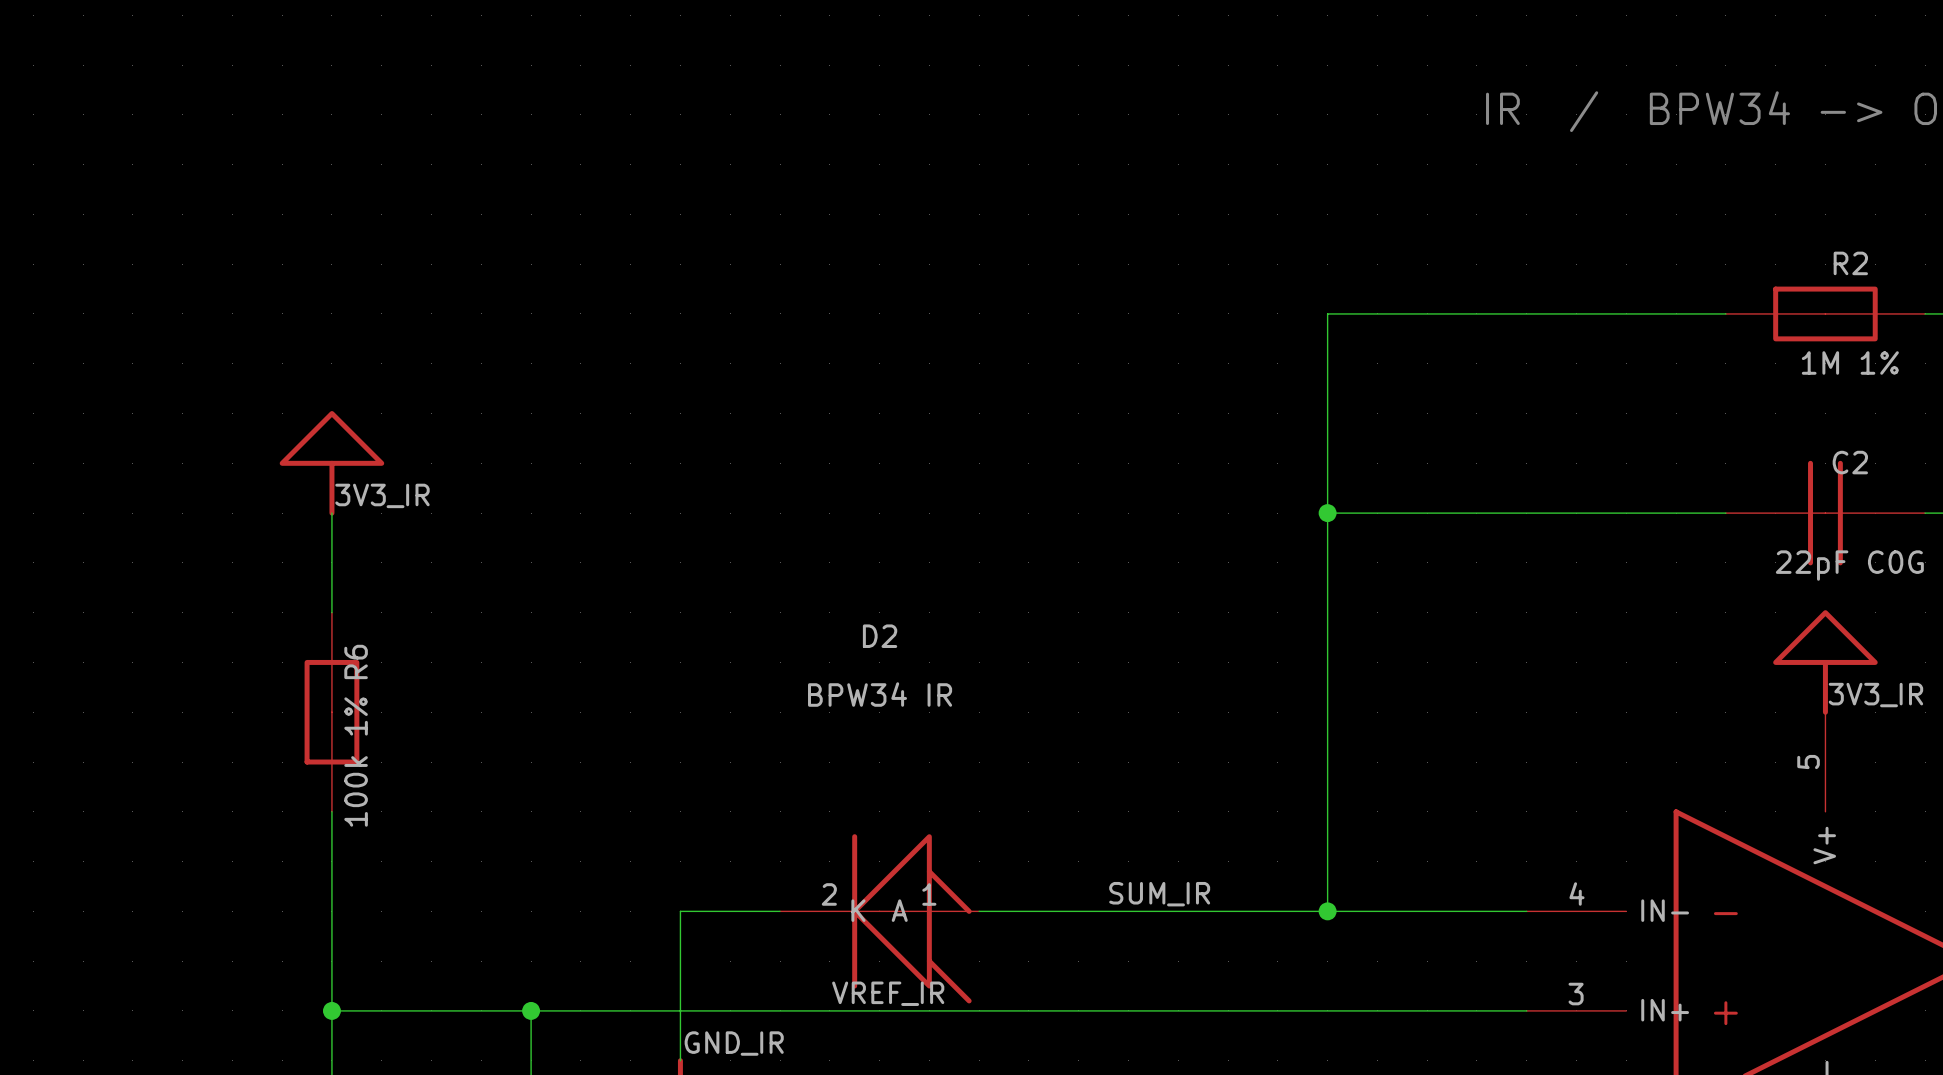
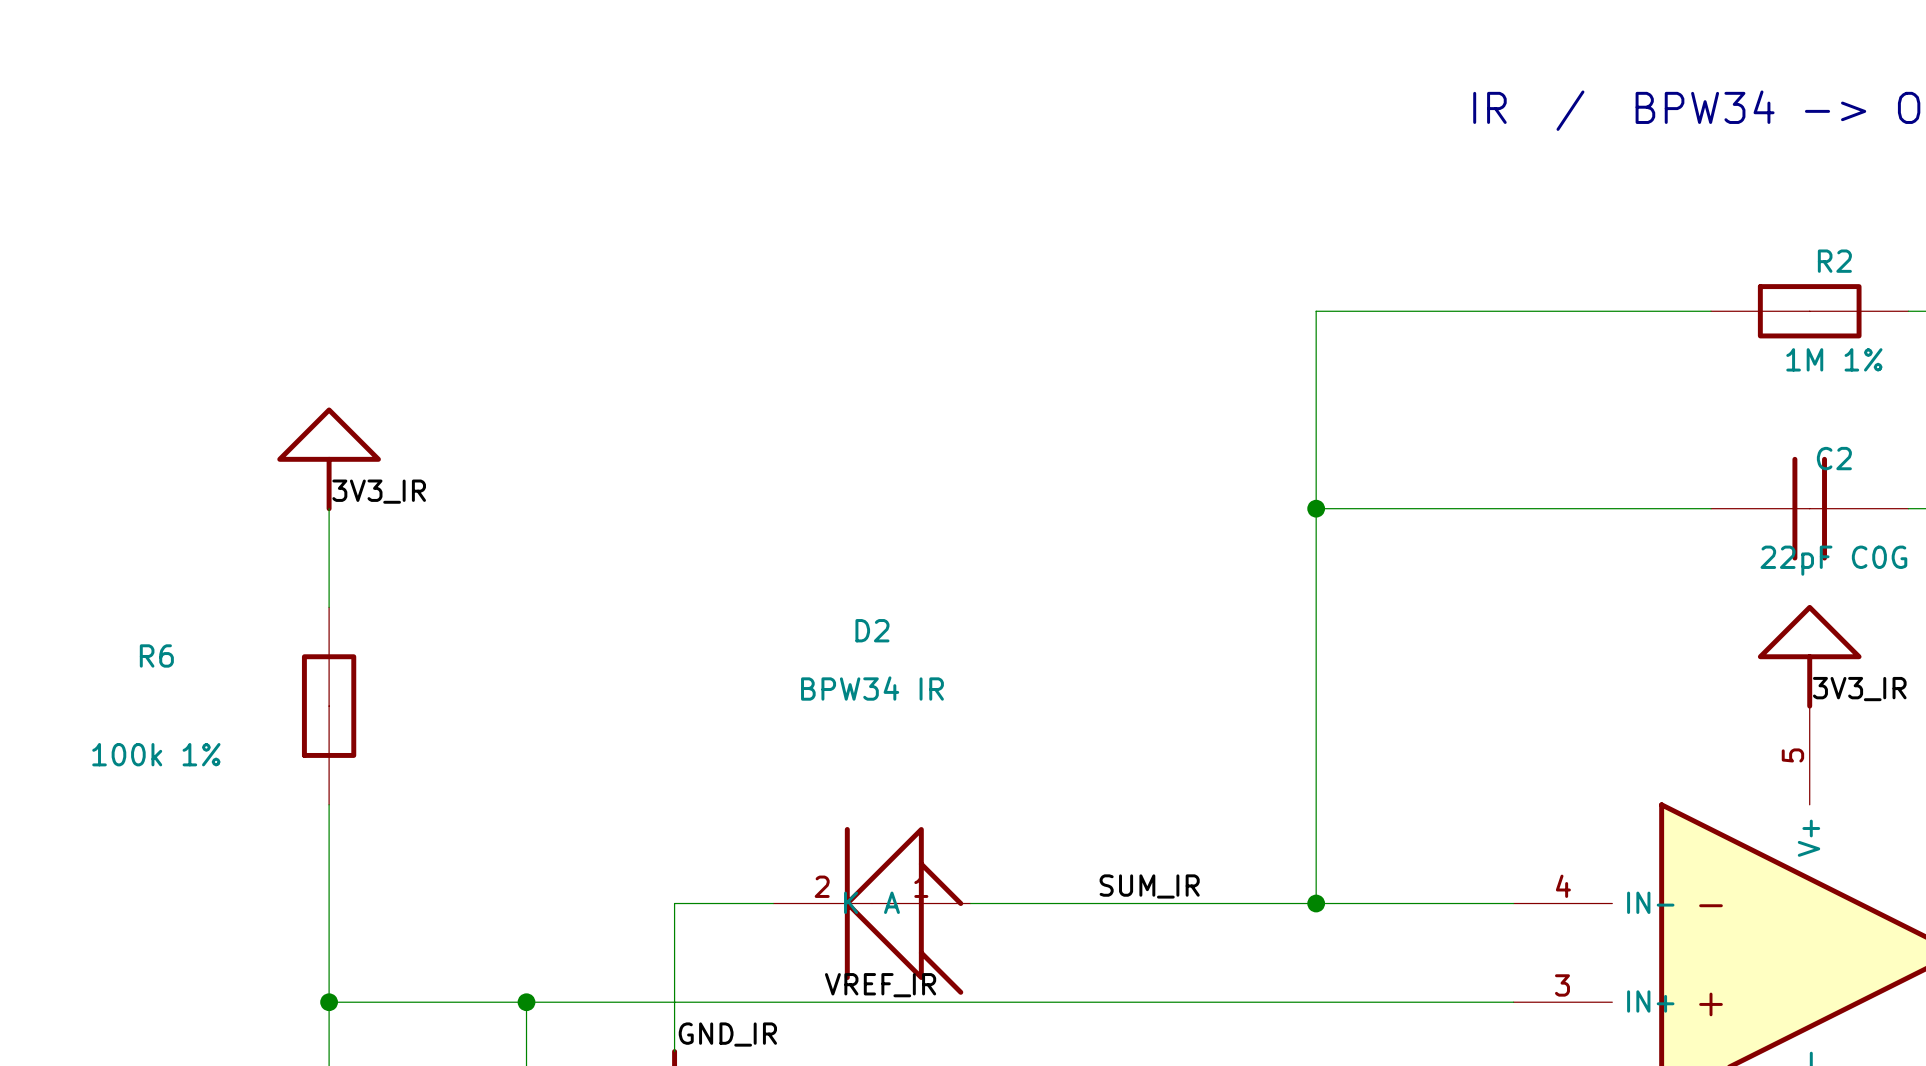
R6 name rotation: 0° (356, 661) -> 90° clockwise (156, 655)
R6 name position: R6 (356, 661) -> R6 (156, 655)
R6 value rotation: 0° (356, 762) -> 90° clockwise (156, 754)
R6 value position: 100k 1% (356, 762) -> 100k 1% (156, 754)

